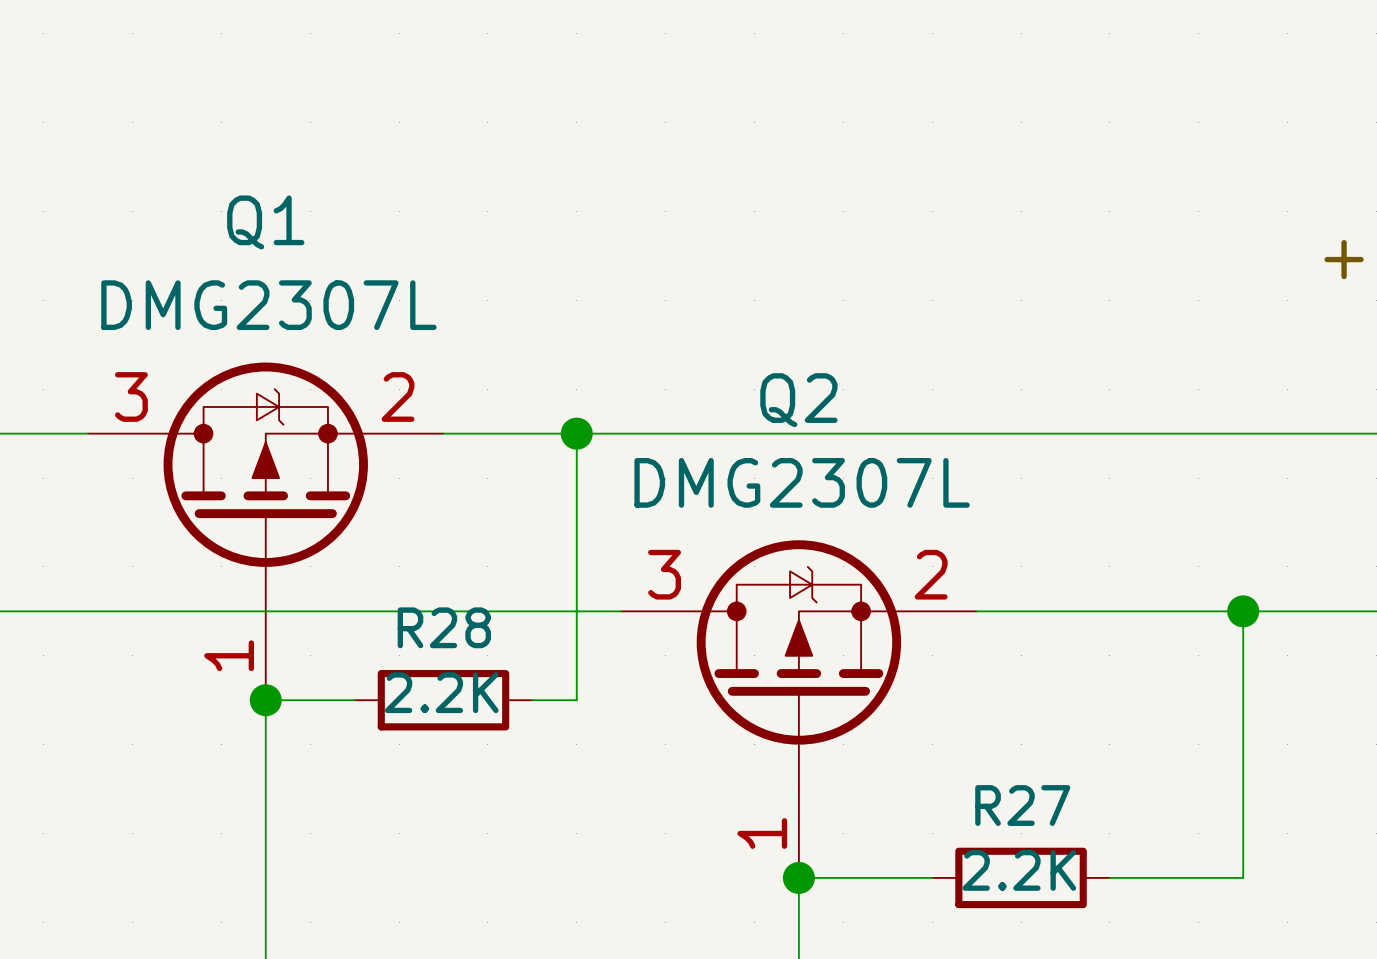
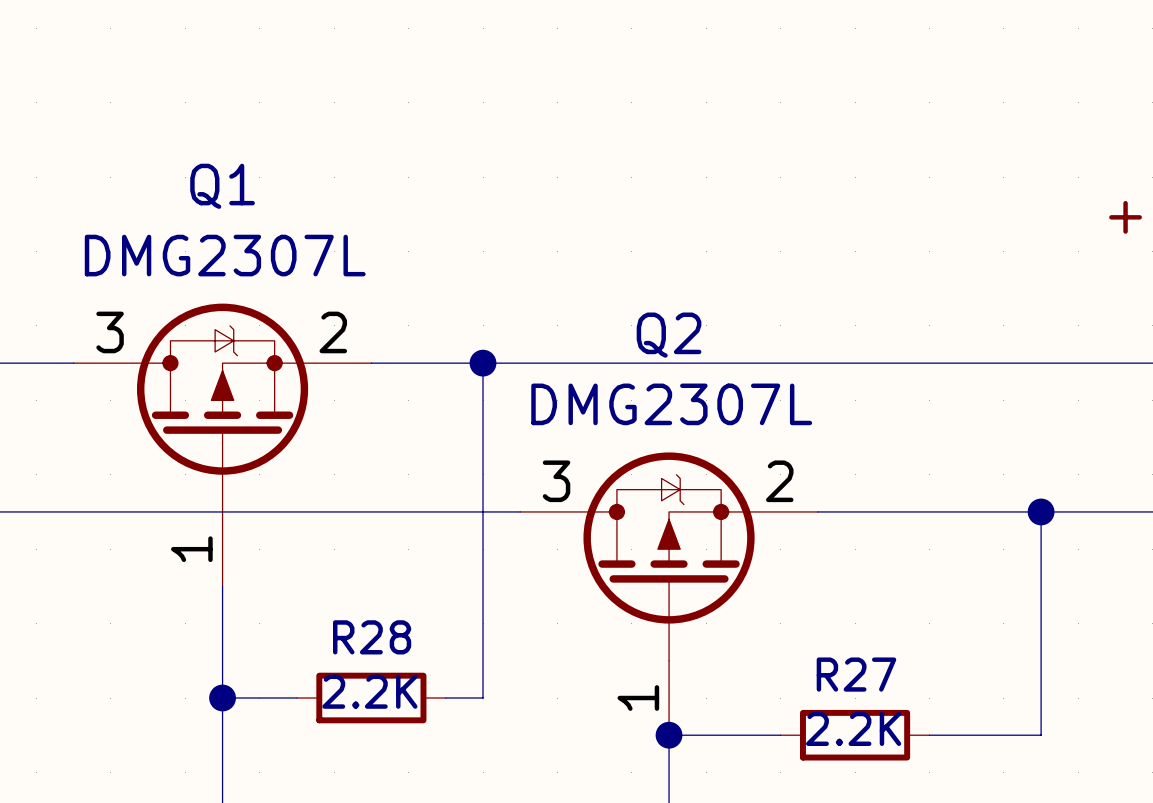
wire: (265, 700) (354, 700) -> (222, 698) (296, 698)
junction position: (265, 700) -> (222, 698)
R28 position: (443, 700) -> (371, 698)
wire: (532, 700) (576, 700) -> (445, 698) (483, 698) (483, 586)

